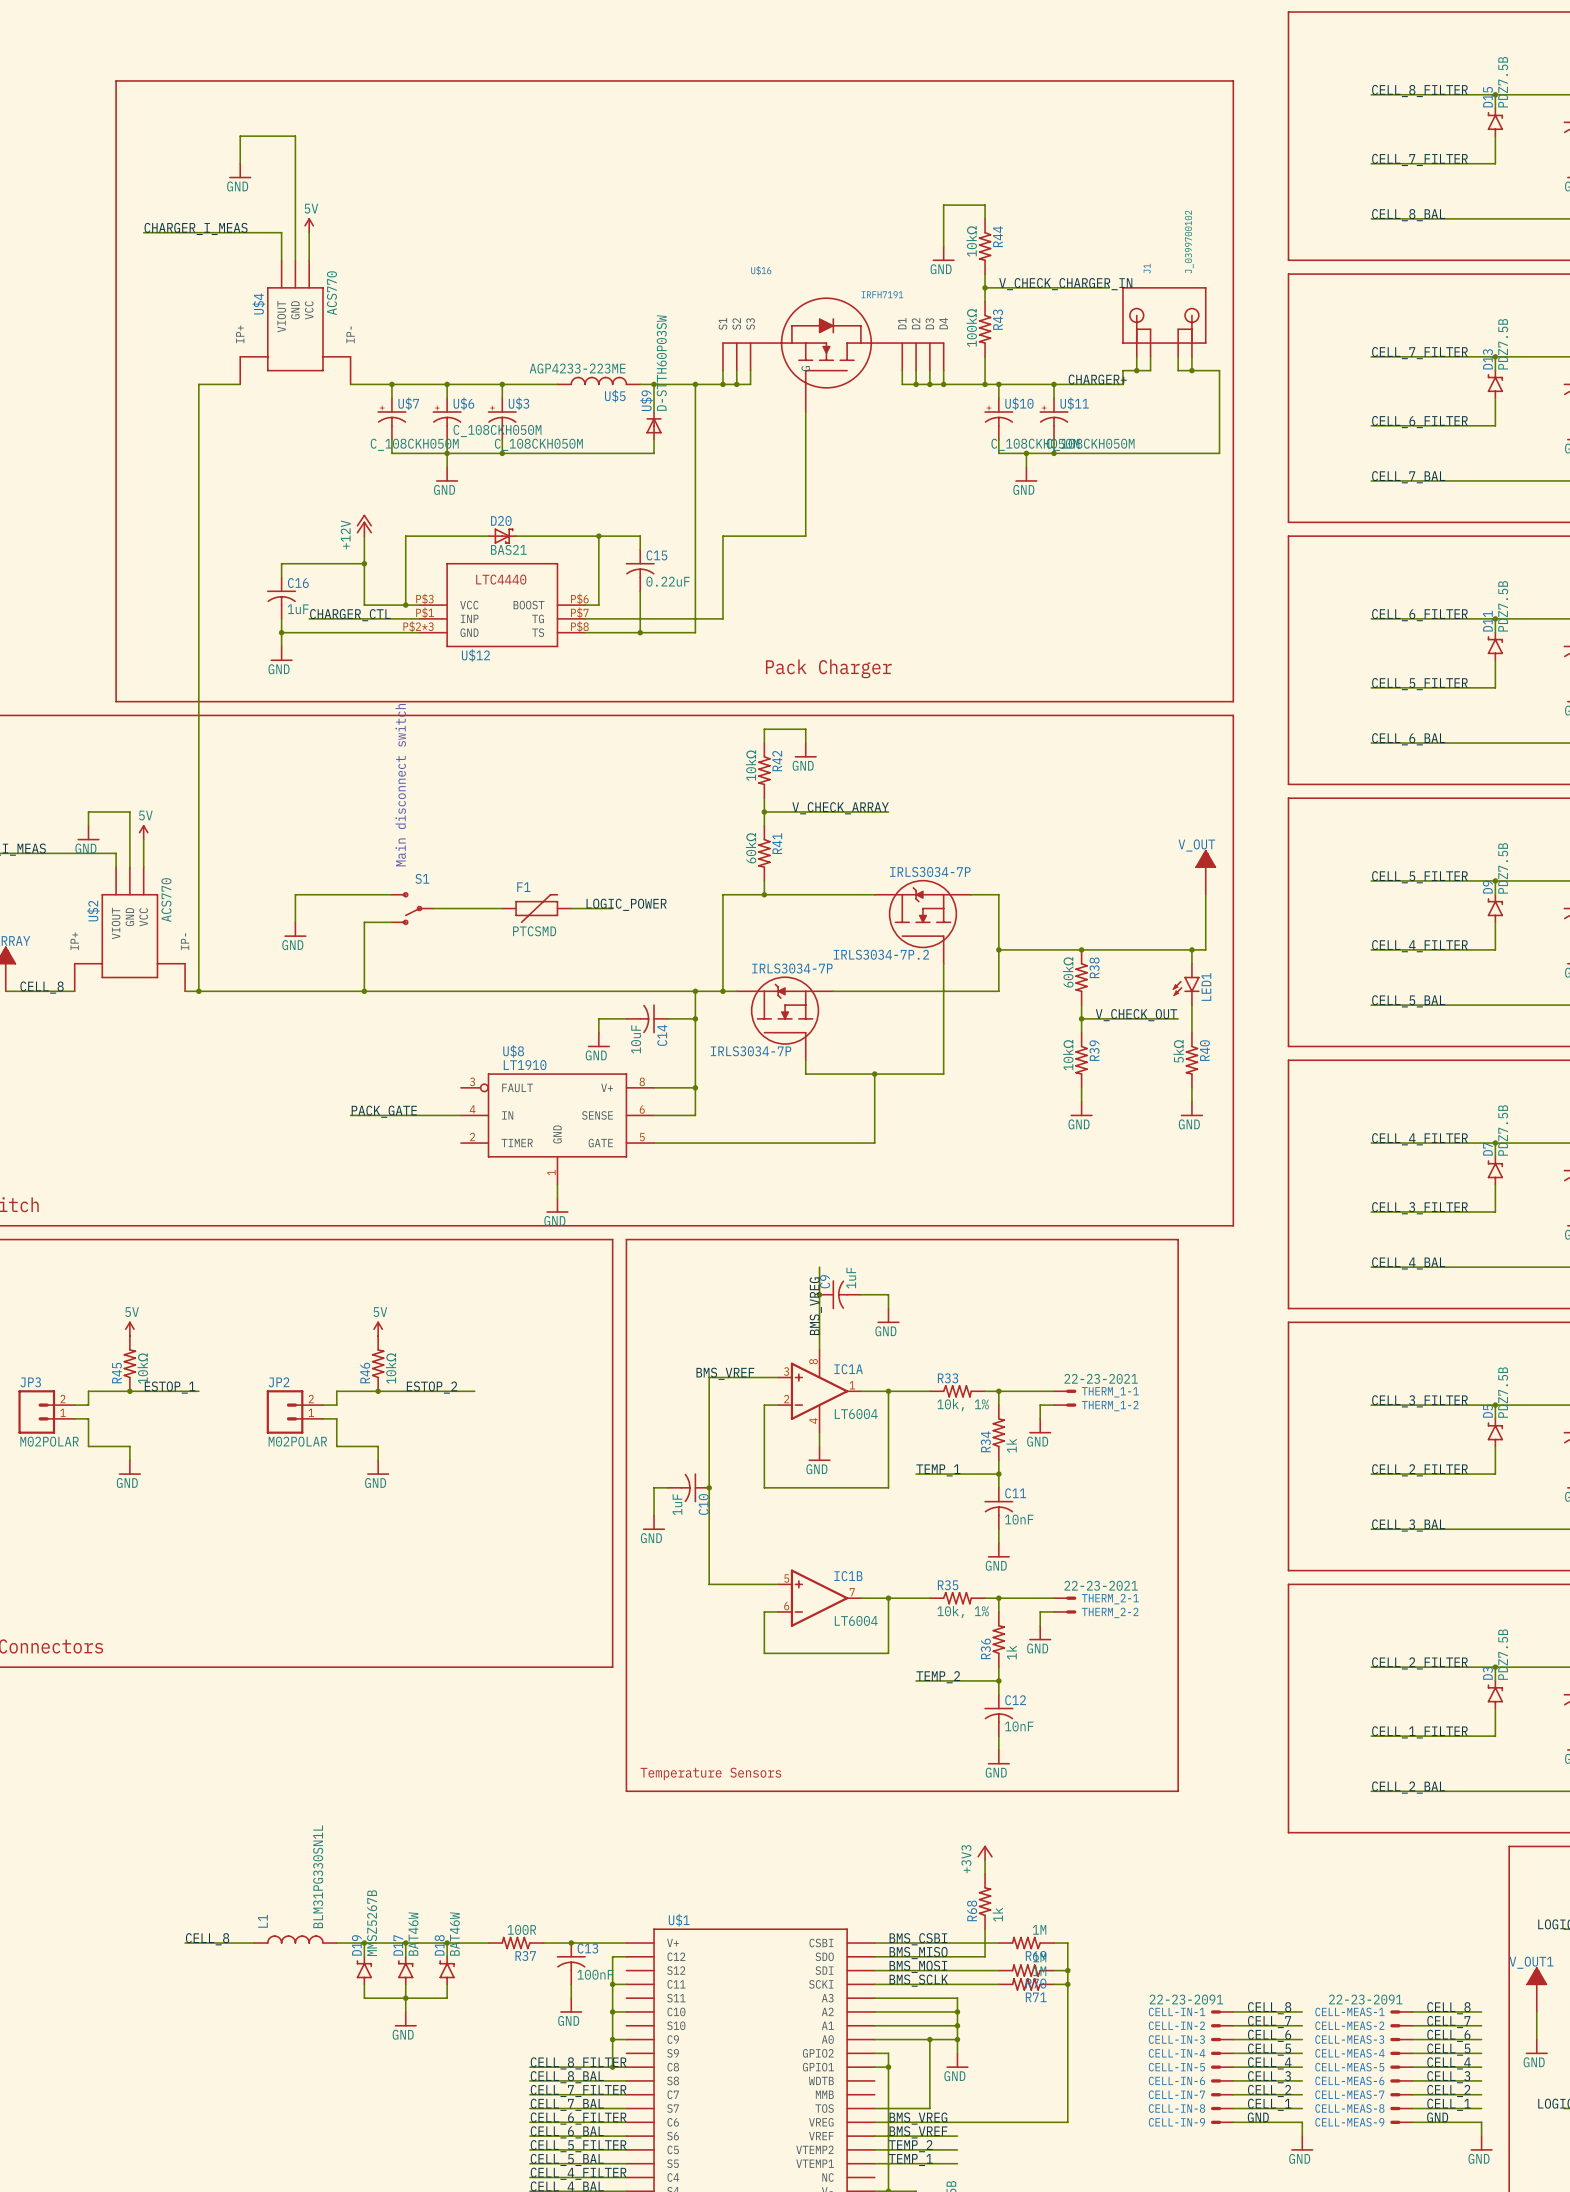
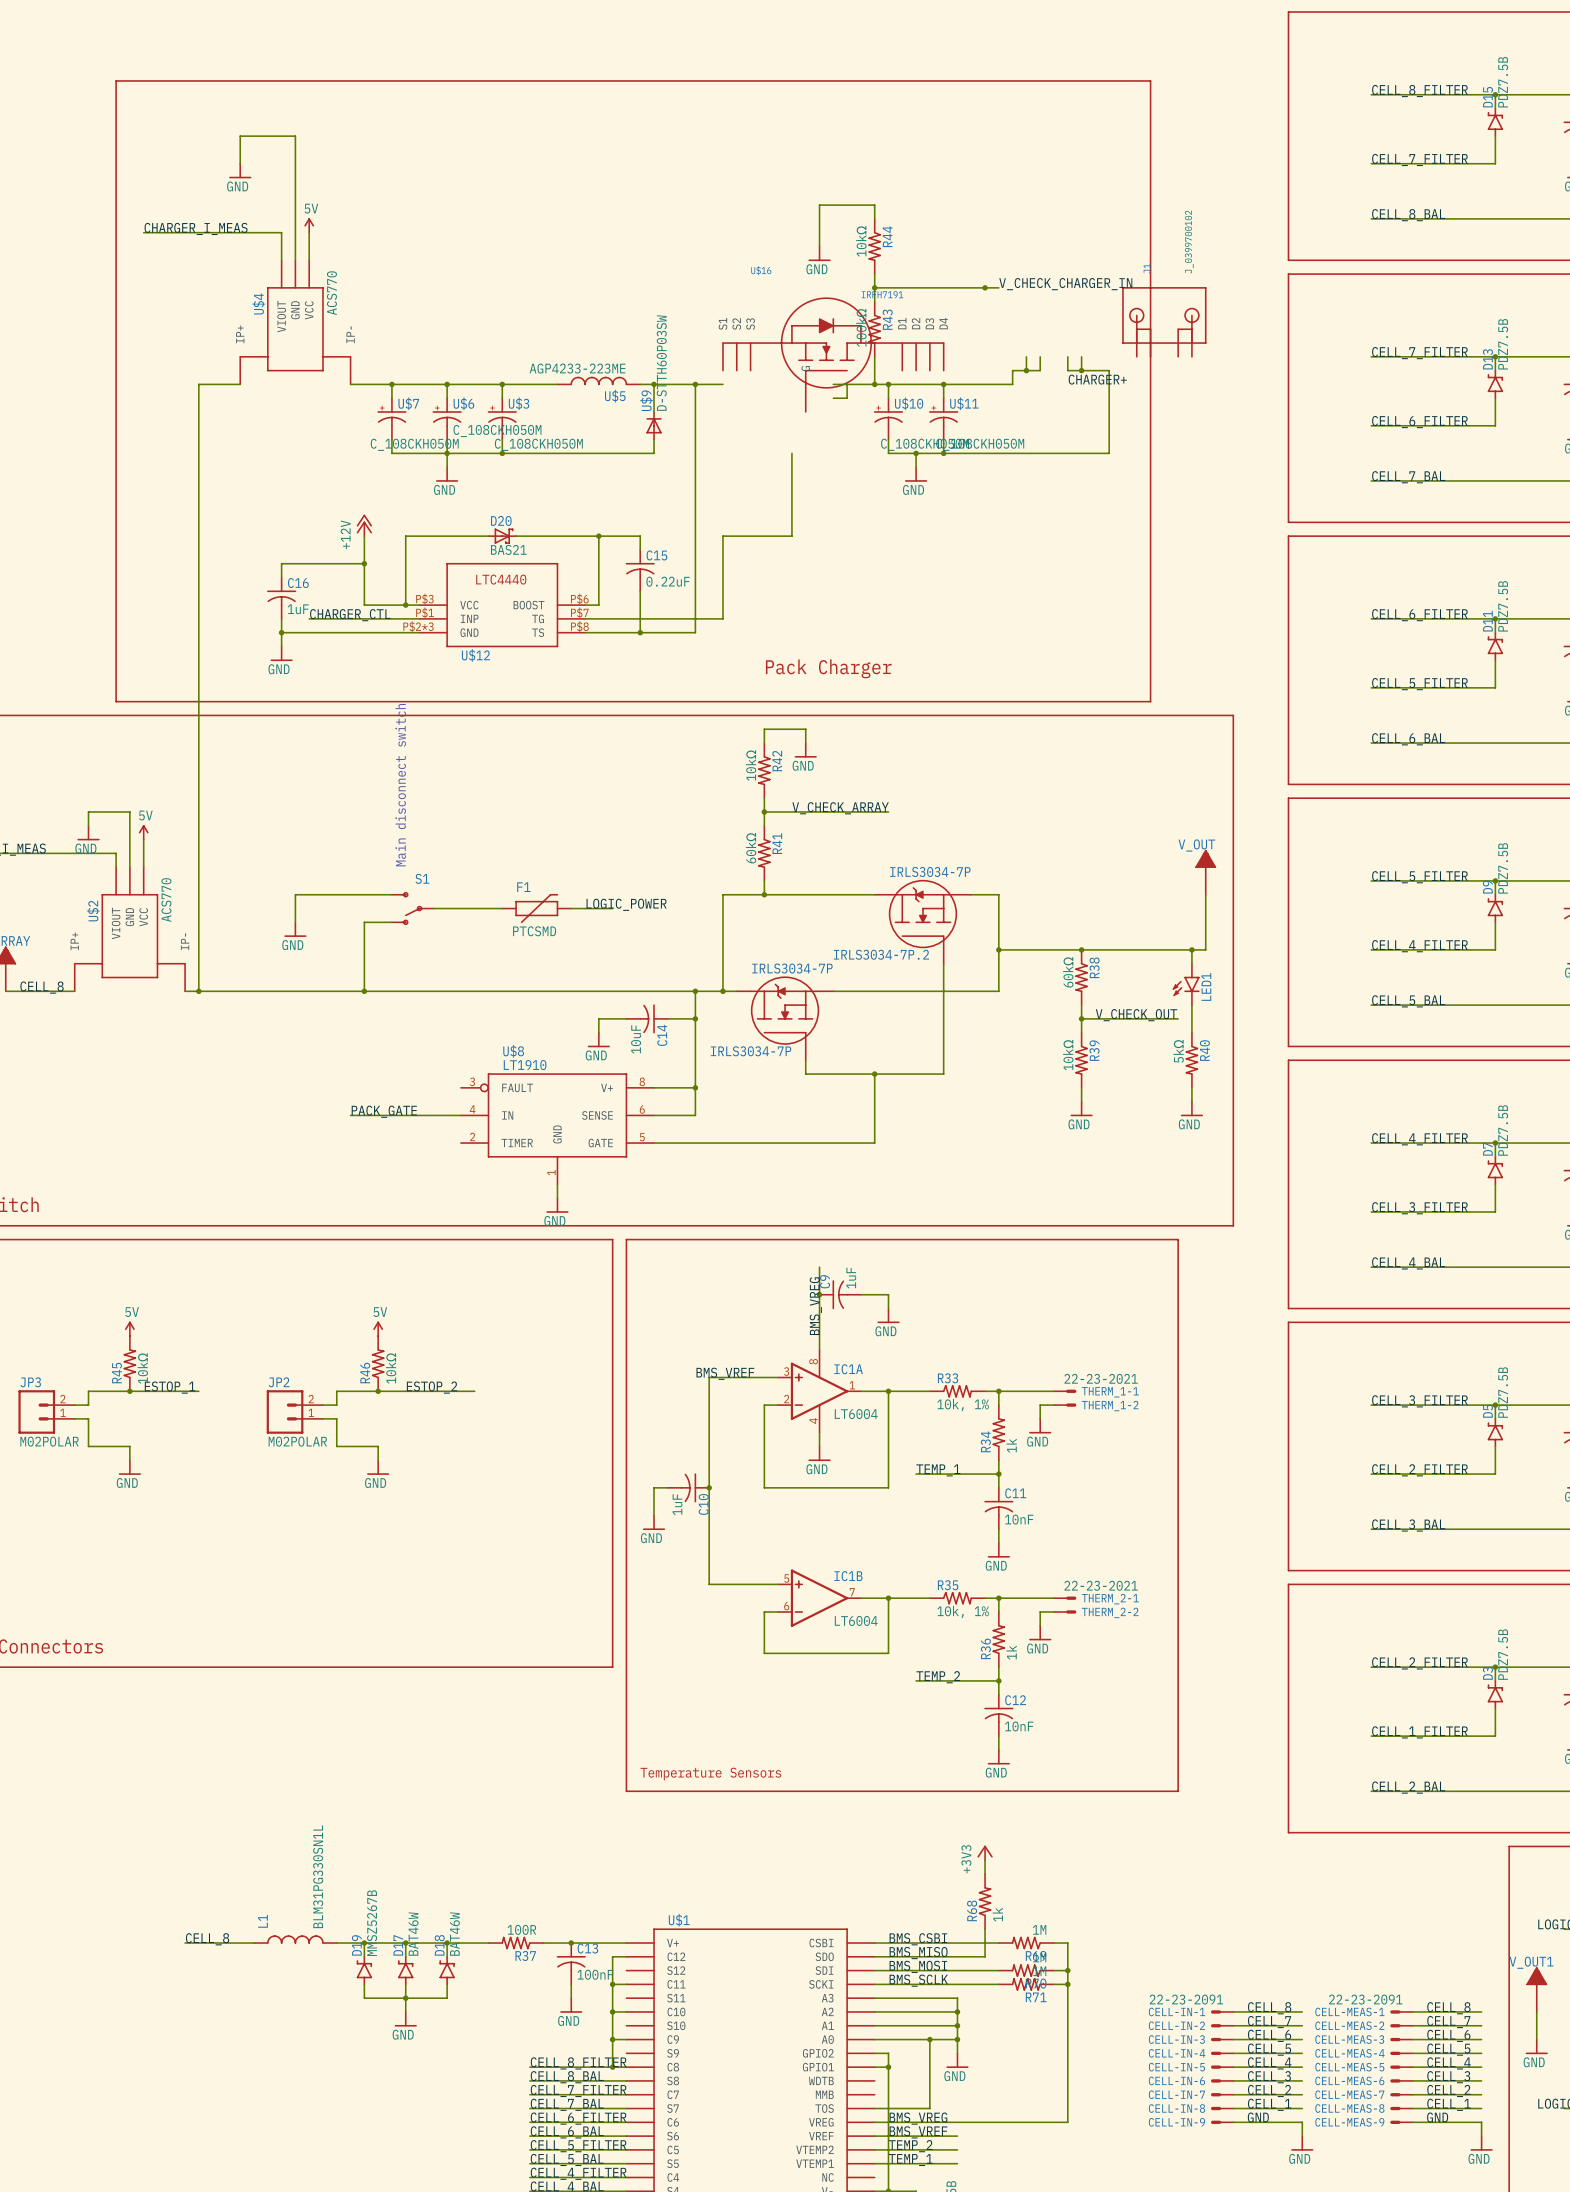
line: (1150, 80) (1233, 80) (1233, 701) (1150, 701) -> (1150, 80) (1150, 701)
wire: none -> (874, 218) (874, 205) (819, 205) (819, 246)
wire: (985, 218) (985, 205) (943, 205) (943, 246) -> none
R44 position: (985, 246) -> (874, 246)
power symbol: none -> GND (819, 253)
power symbol: GND (943, 253) -> none
wire: (985, 274) (985, 301) -> (874, 274) (874, 301)
junction: none -> (874, 287)
wire: (998, 287) (1109, 287) -> (874, 287) (985, 287)
R43 position: (985, 329) -> (874, 329)
wire: (985, 356) (985, 384) -> (874, 356) (874, 384)
wire: (1136, 356) (1136, 370) -> (1026, 356) (1026, 370)
wire: (1150, 356) (1150, 370) (1122, 370) (1122, 384) (1012, 384) -> (1040, 356) (1040, 370) (1012, 370) (1012, 384)
wire: (1178, 356) (1178, 370) (1219, 370) (1219, 453) (1109, 453) -> (1067, 356) (1067, 370) (1109, 370) (1109, 453)
wire: (1191, 356) (1191, 370) -> (1081, 356) (1081, 370)
wire: (722, 370) (722, 384) (750, 384) (750, 370) -> none
wire: (736, 370) (736, 384) -> none
wire: (902, 370) (902, 384) -> (833, 384) (902, 384)
wire: (916, 370) (916, 384) -> none
wire: (929, 370) (929, 384) -> none
wire: (943, 370) (943, 384) -> (943, 398) (943, 384)
junction: none -> (1026, 370)
junction: none -> (1081, 370)
junction: (1136, 370) -> none
junction: (1191, 370) -> none
junction: (722, 384) -> none
junction: (736, 384) -> none
wire: none -> (847, 384) (847, 398) (833, 398)
junction: none -> (874, 384)
junction: none -> (888, 384)
junction: (916, 384) -> none
junction: (929, 384) -> none
junction: (985, 384) -> none
wire: (998, 384) (998, 398) -> (888, 384) (888, 398)
junction: (998, 384) -> none
wire: (1054, 384) (1054, 398) -> none
junction: (1054, 384) -> none
wire: (805, 412) (805, 536) (791, 536) -> (791, 453) (791, 536)
U$10 position: (998, 418) -> (888, 418)
U$11 position: (1054, 418) -> (943, 418)
wire: (998, 439) (998, 453) -> (888, 439) (888, 453) (998, 453)
wire: (1054, 439) (1054, 453) -> (943, 439) (943, 453)
junction: none -> (916, 453)
junction: none -> (943, 453)
wire: (1026, 453) (1026, 467) -> (916, 453) (916, 467)
junction: (1026, 453) -> none
junction: (1054, 453) -> none
power symbol position: GND (1026, 474) -> GND (916, 474)

